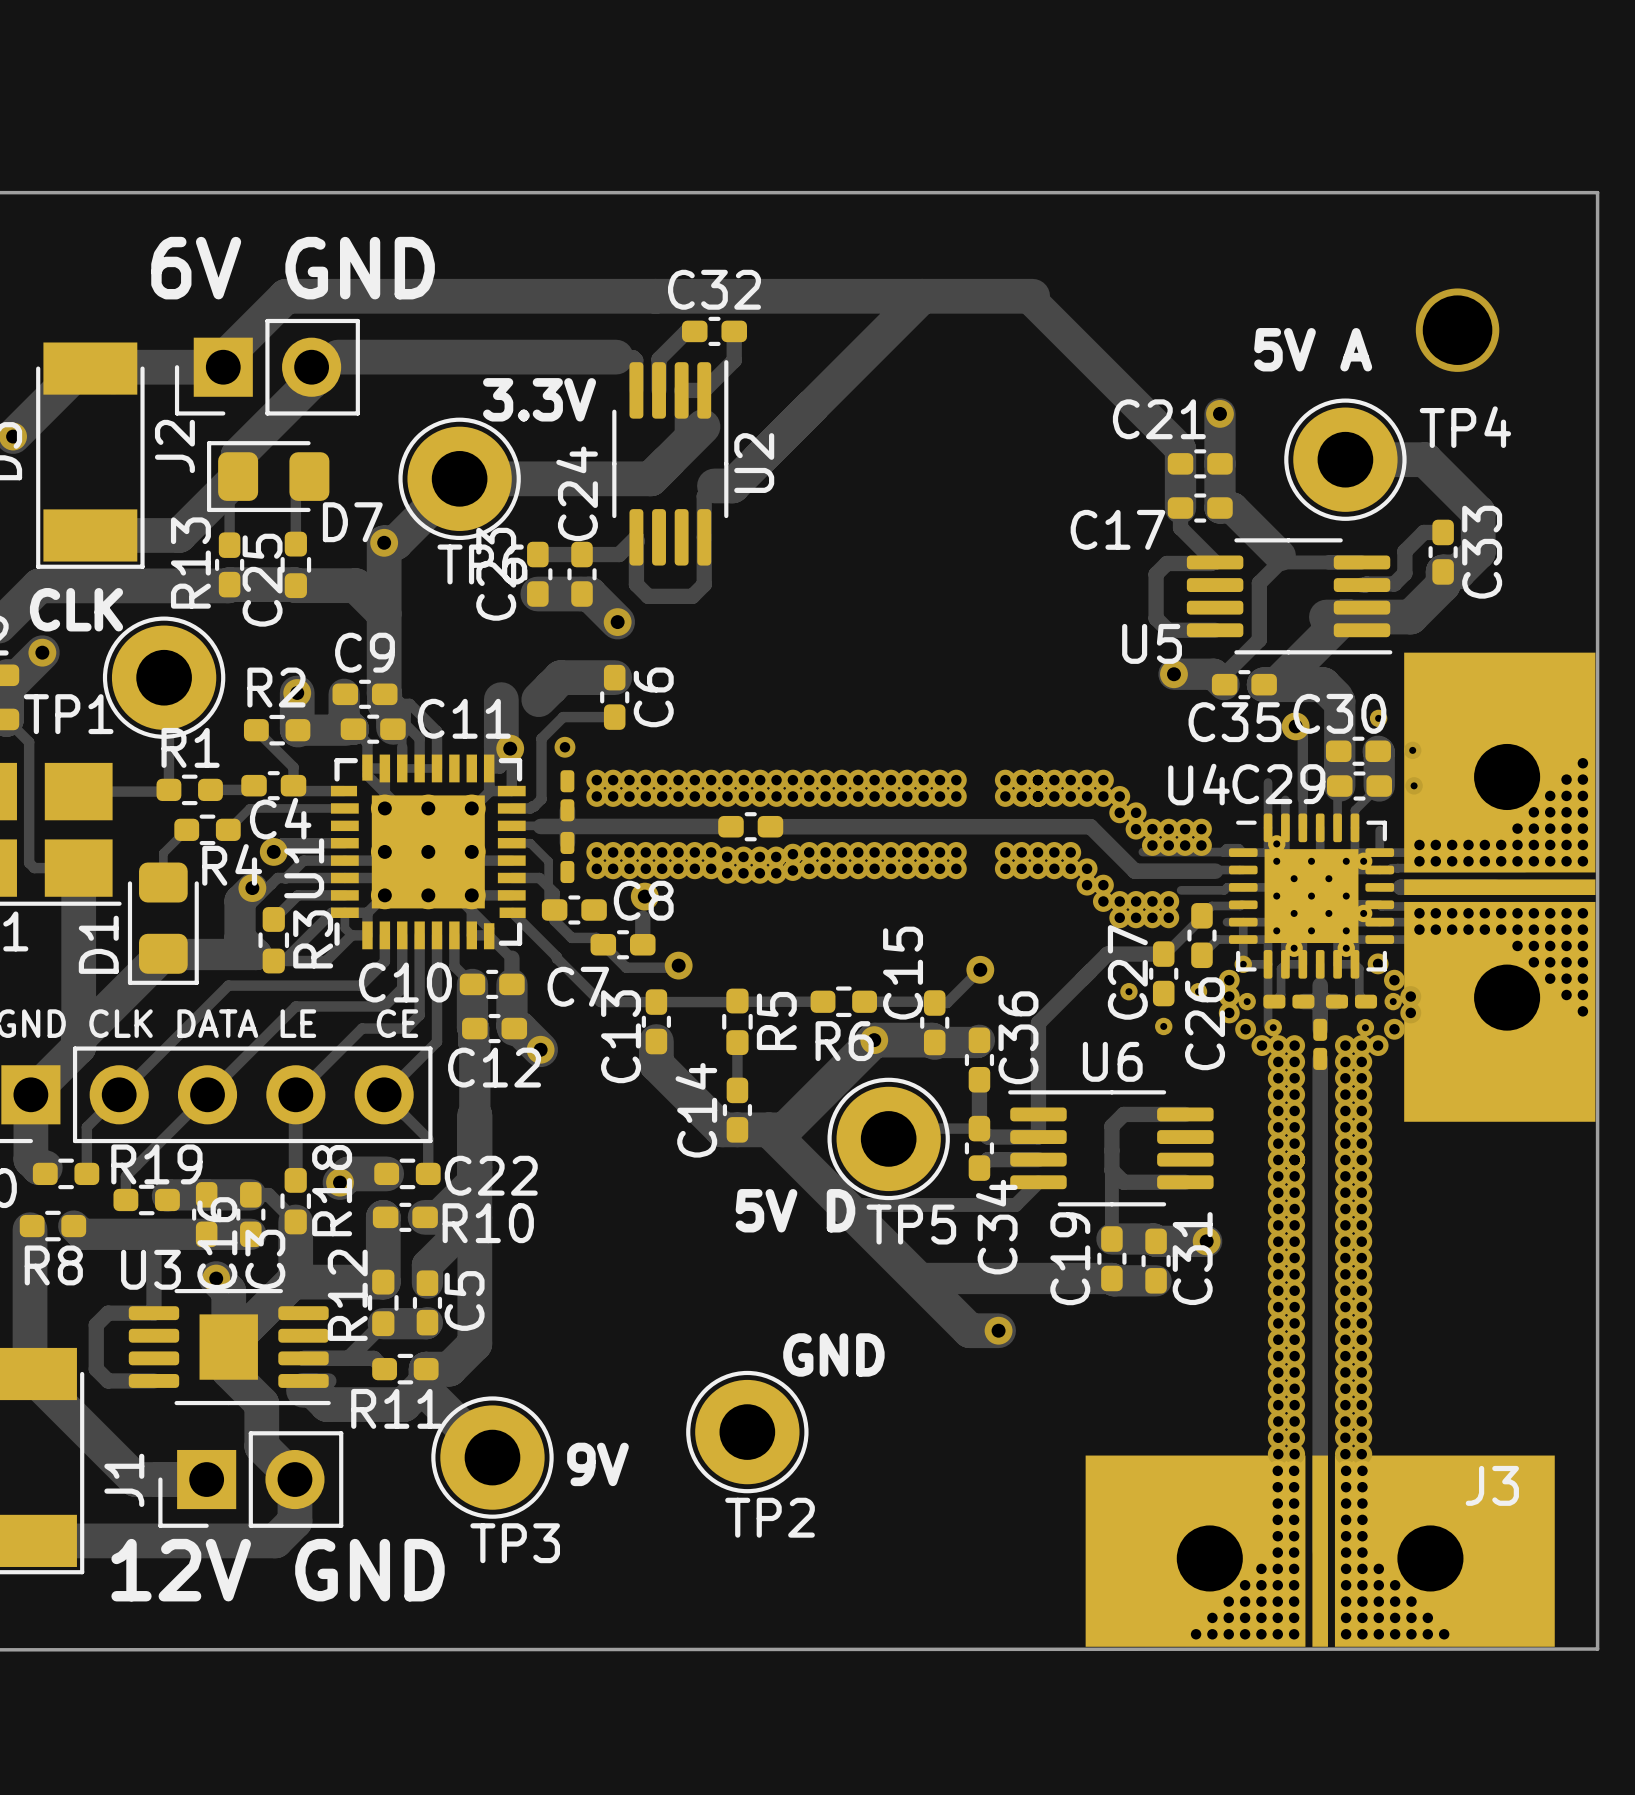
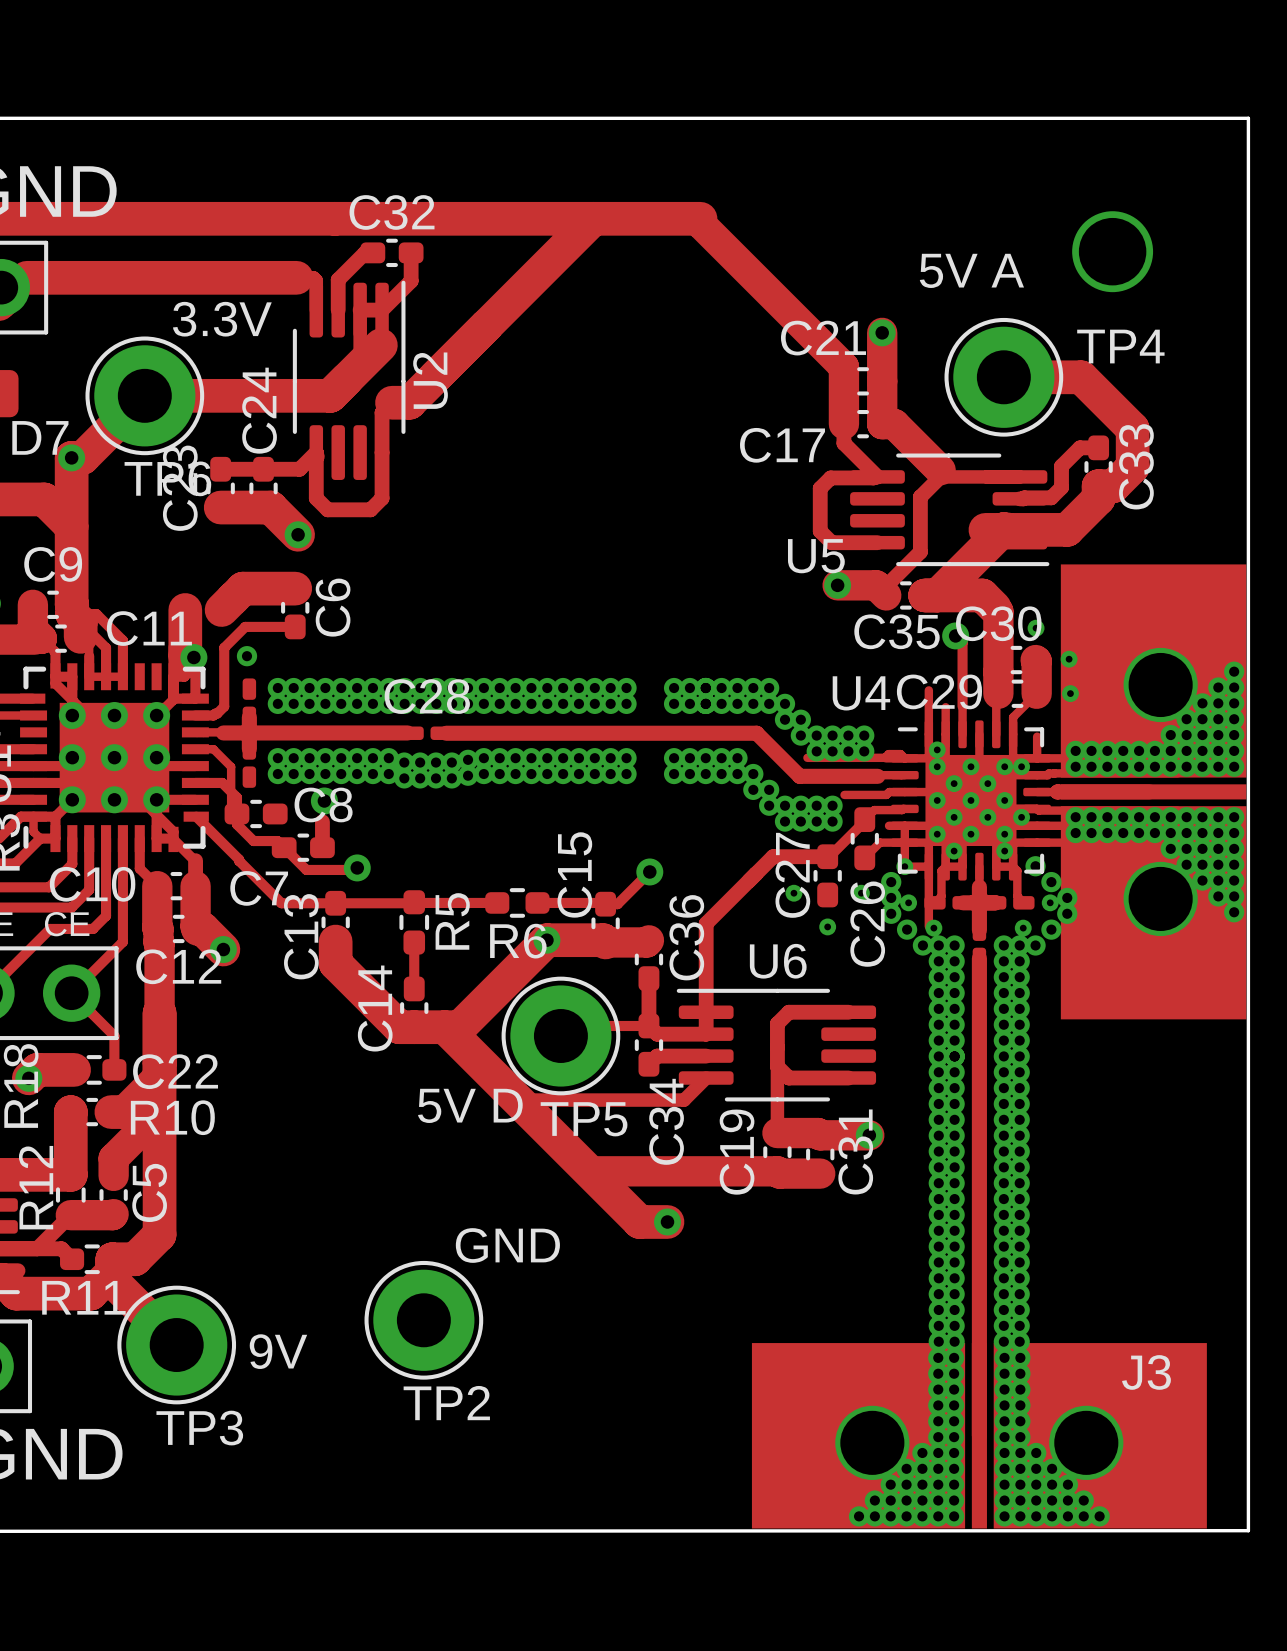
part: (750, 826) -> none
C28: none -> (427, 733)

